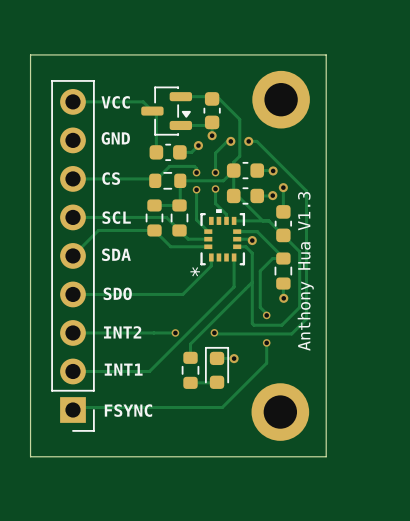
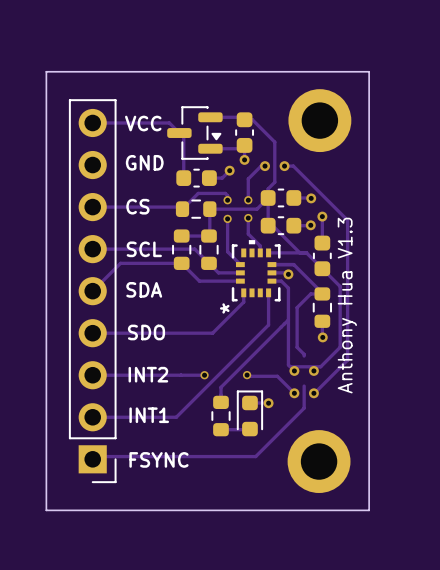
via: (266, 315) -> none
via: none -> (294, 370)
via: none -> (313, 370)
track: (242, 333) (291, 333) -> (313, 393) (331, 376)
track: none -> (277, 376) (294, 393)
via: (266, 342) -> none
via: none -> (294, 393)
via: none -> (313, 393)

